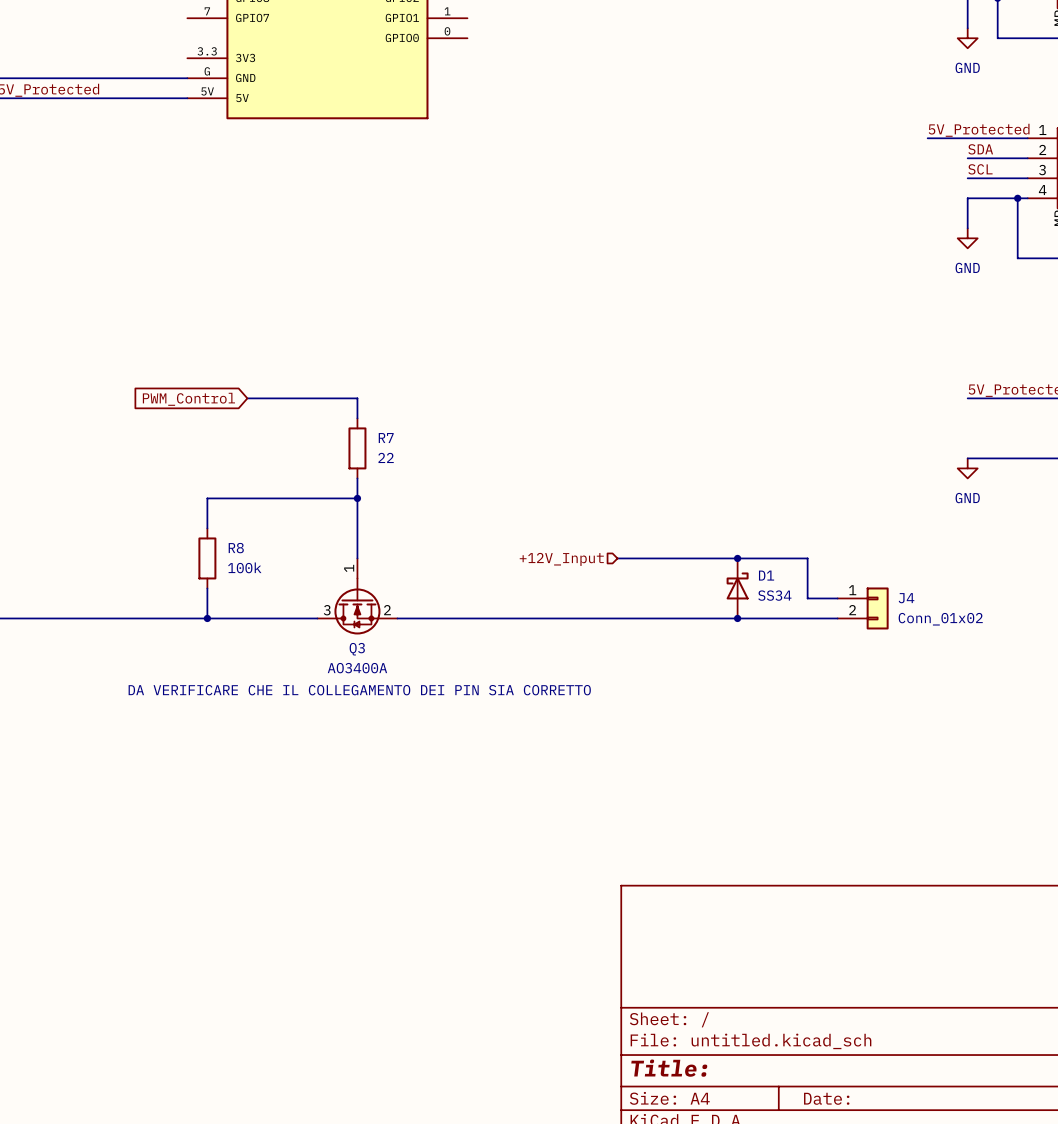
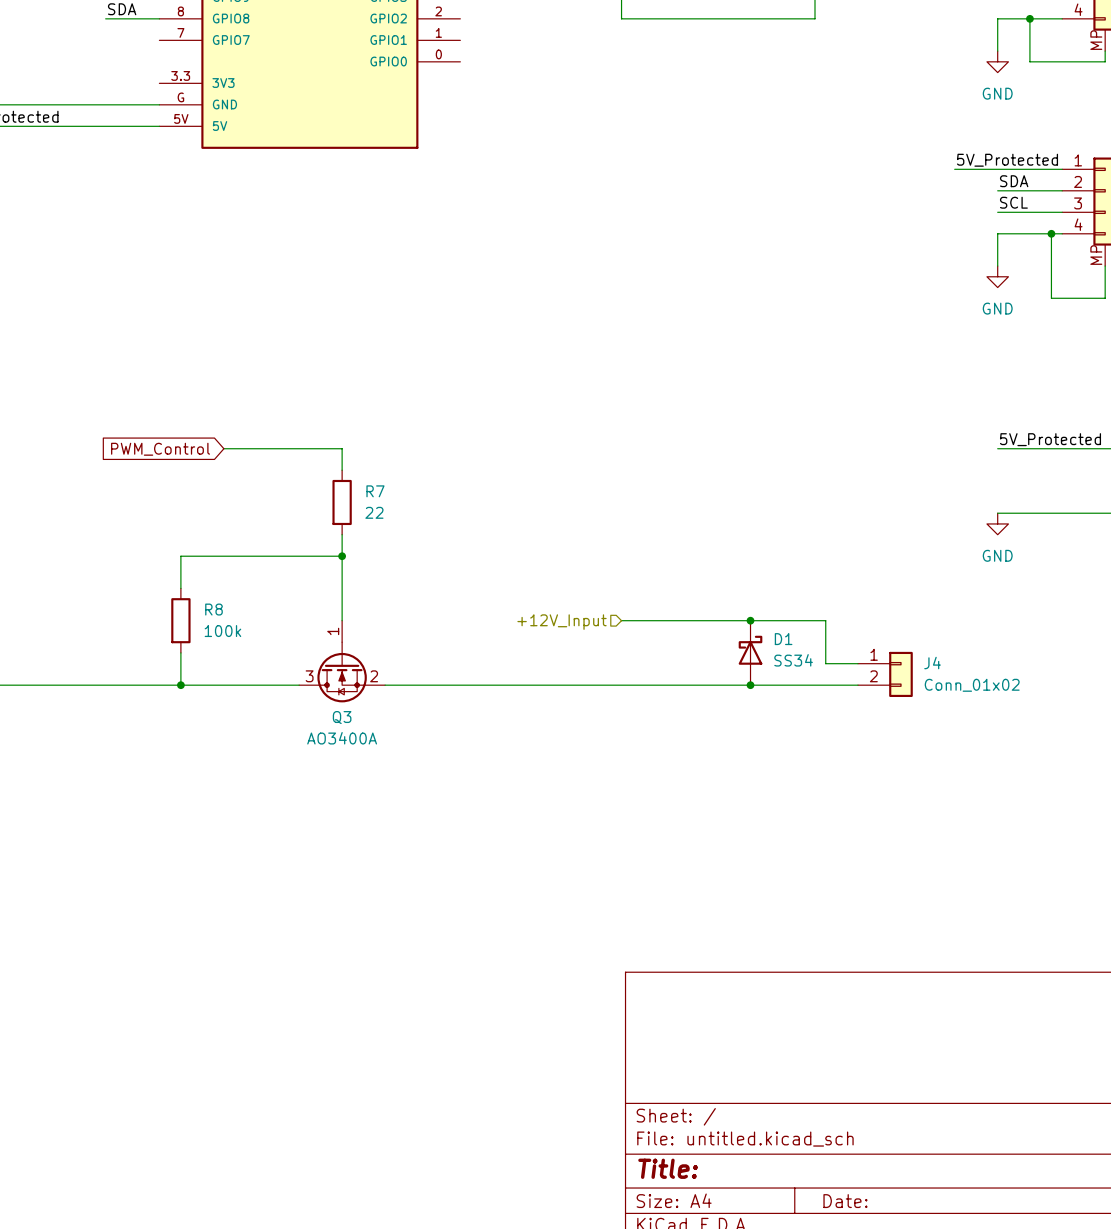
text: DA VERIFICARE CHE IL COLLEGAMENTO DEI PIN SIA CORRETTO (359, 690) -> none

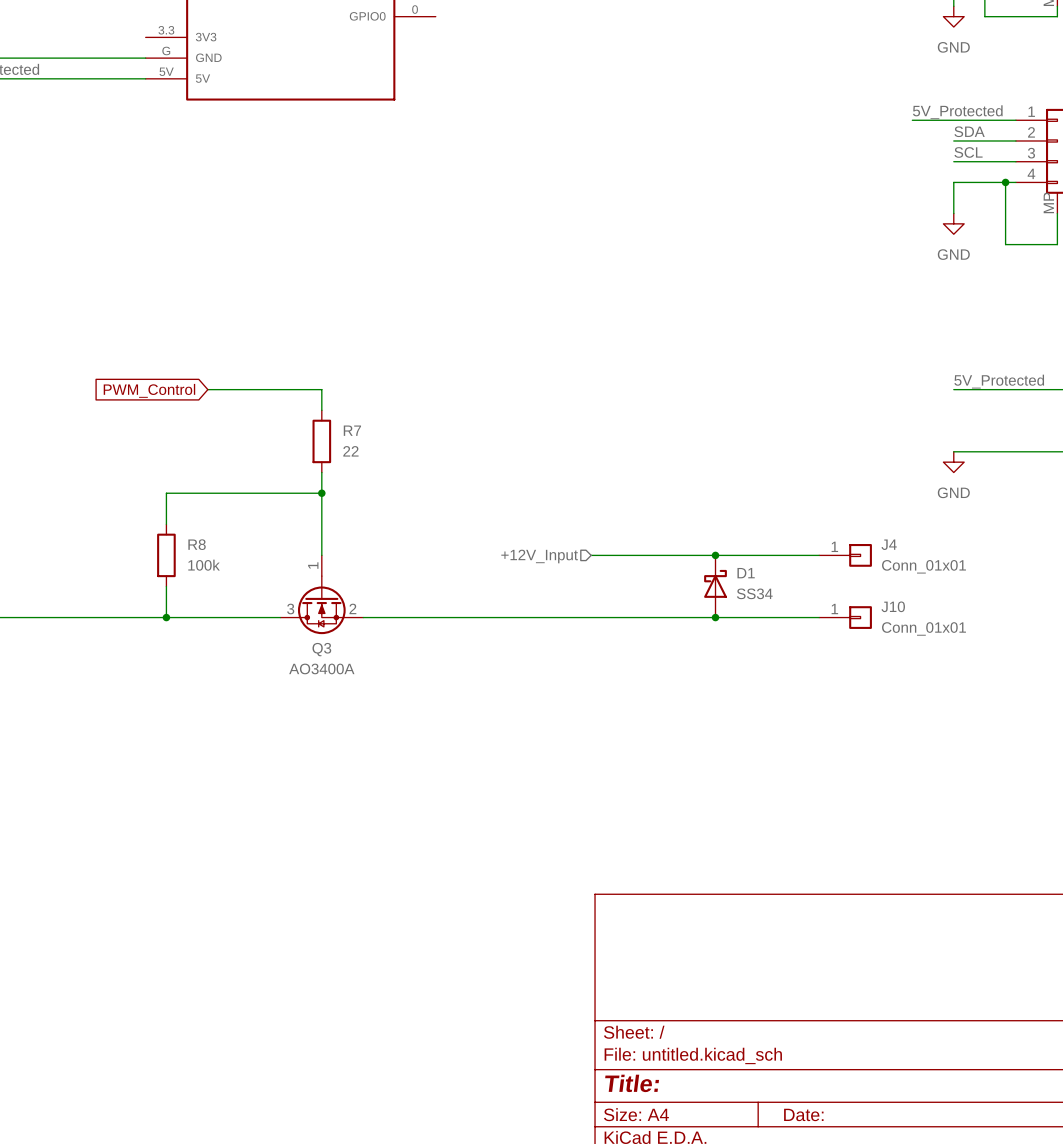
wire: (825, 620) (825, 663) (857, 663) -> (788, 555) (819, 555)
J4 symbol: [857, 651, 913, 698] -> [819, 544, 872, 567]
J10: none -> Conn_01x01 (845, 617)
J4 value: Conn_01x02 (972, 685) -> Conn_01x01 (923, 566)

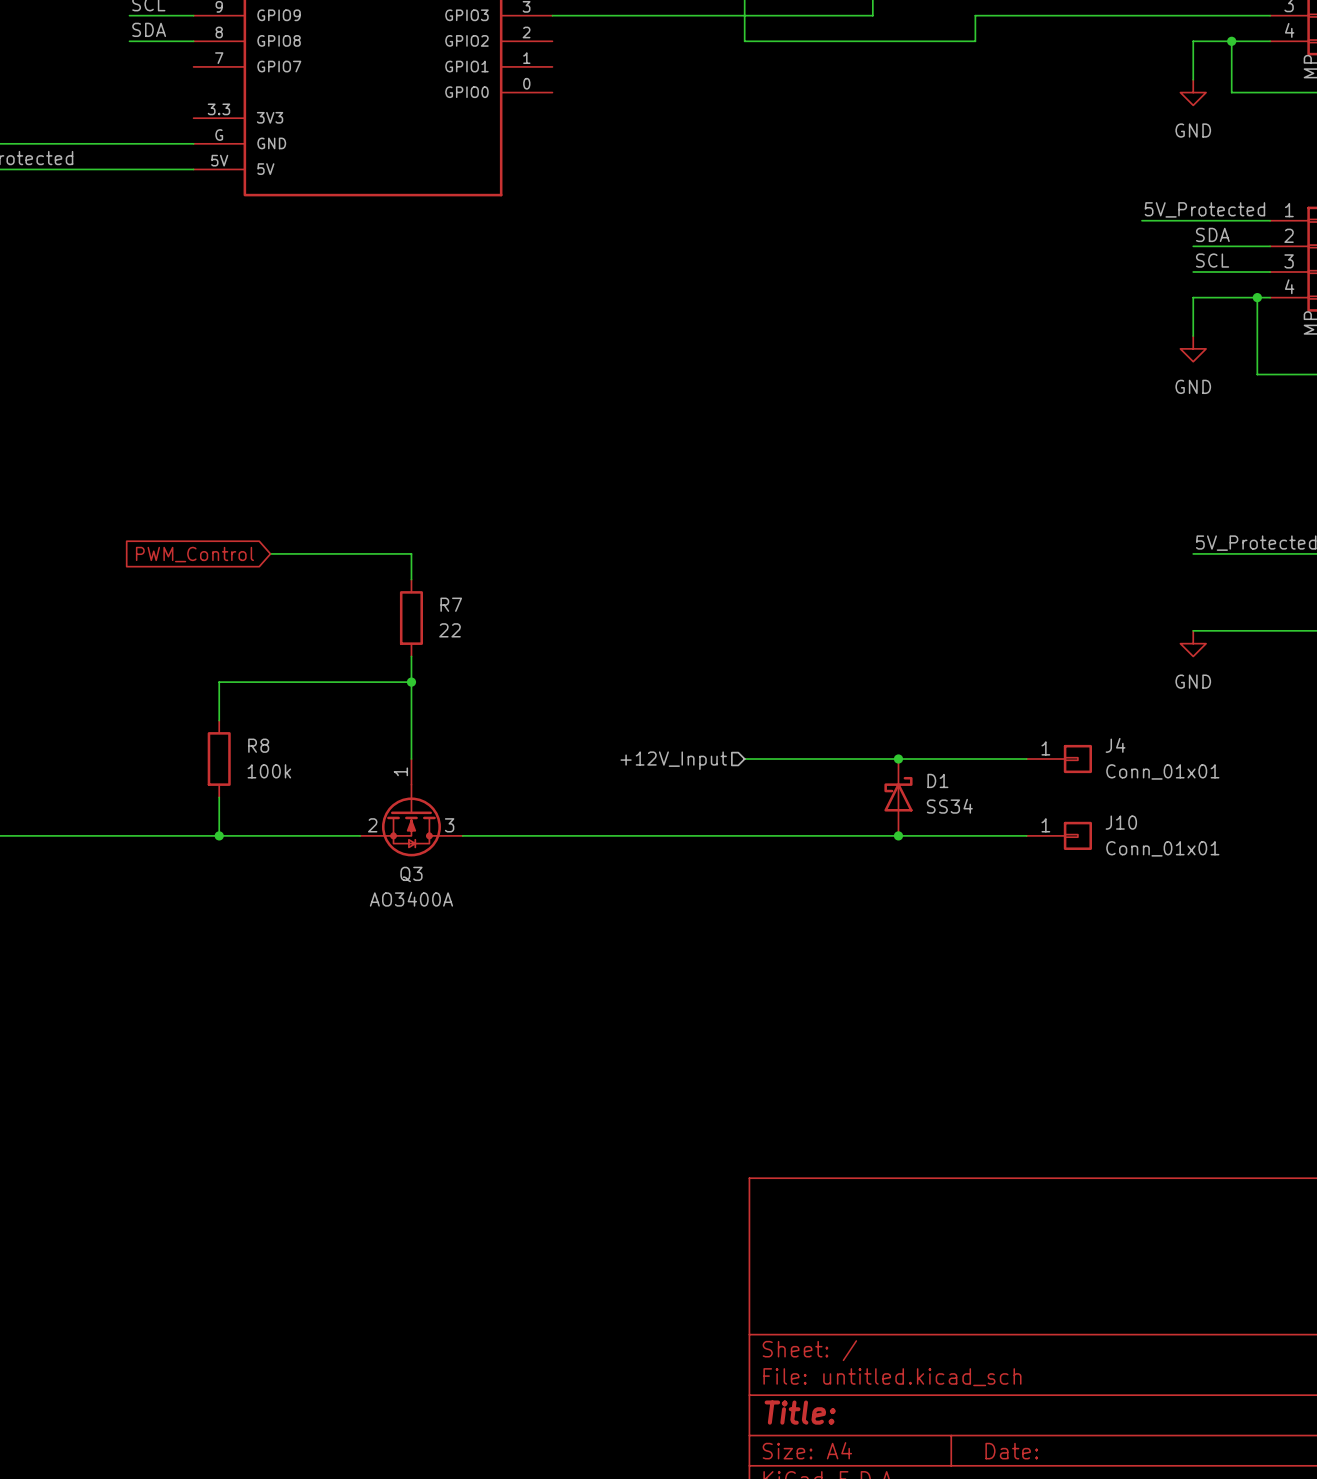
Q3 flip: as is (321, 605) -> left-right (411, 820)

